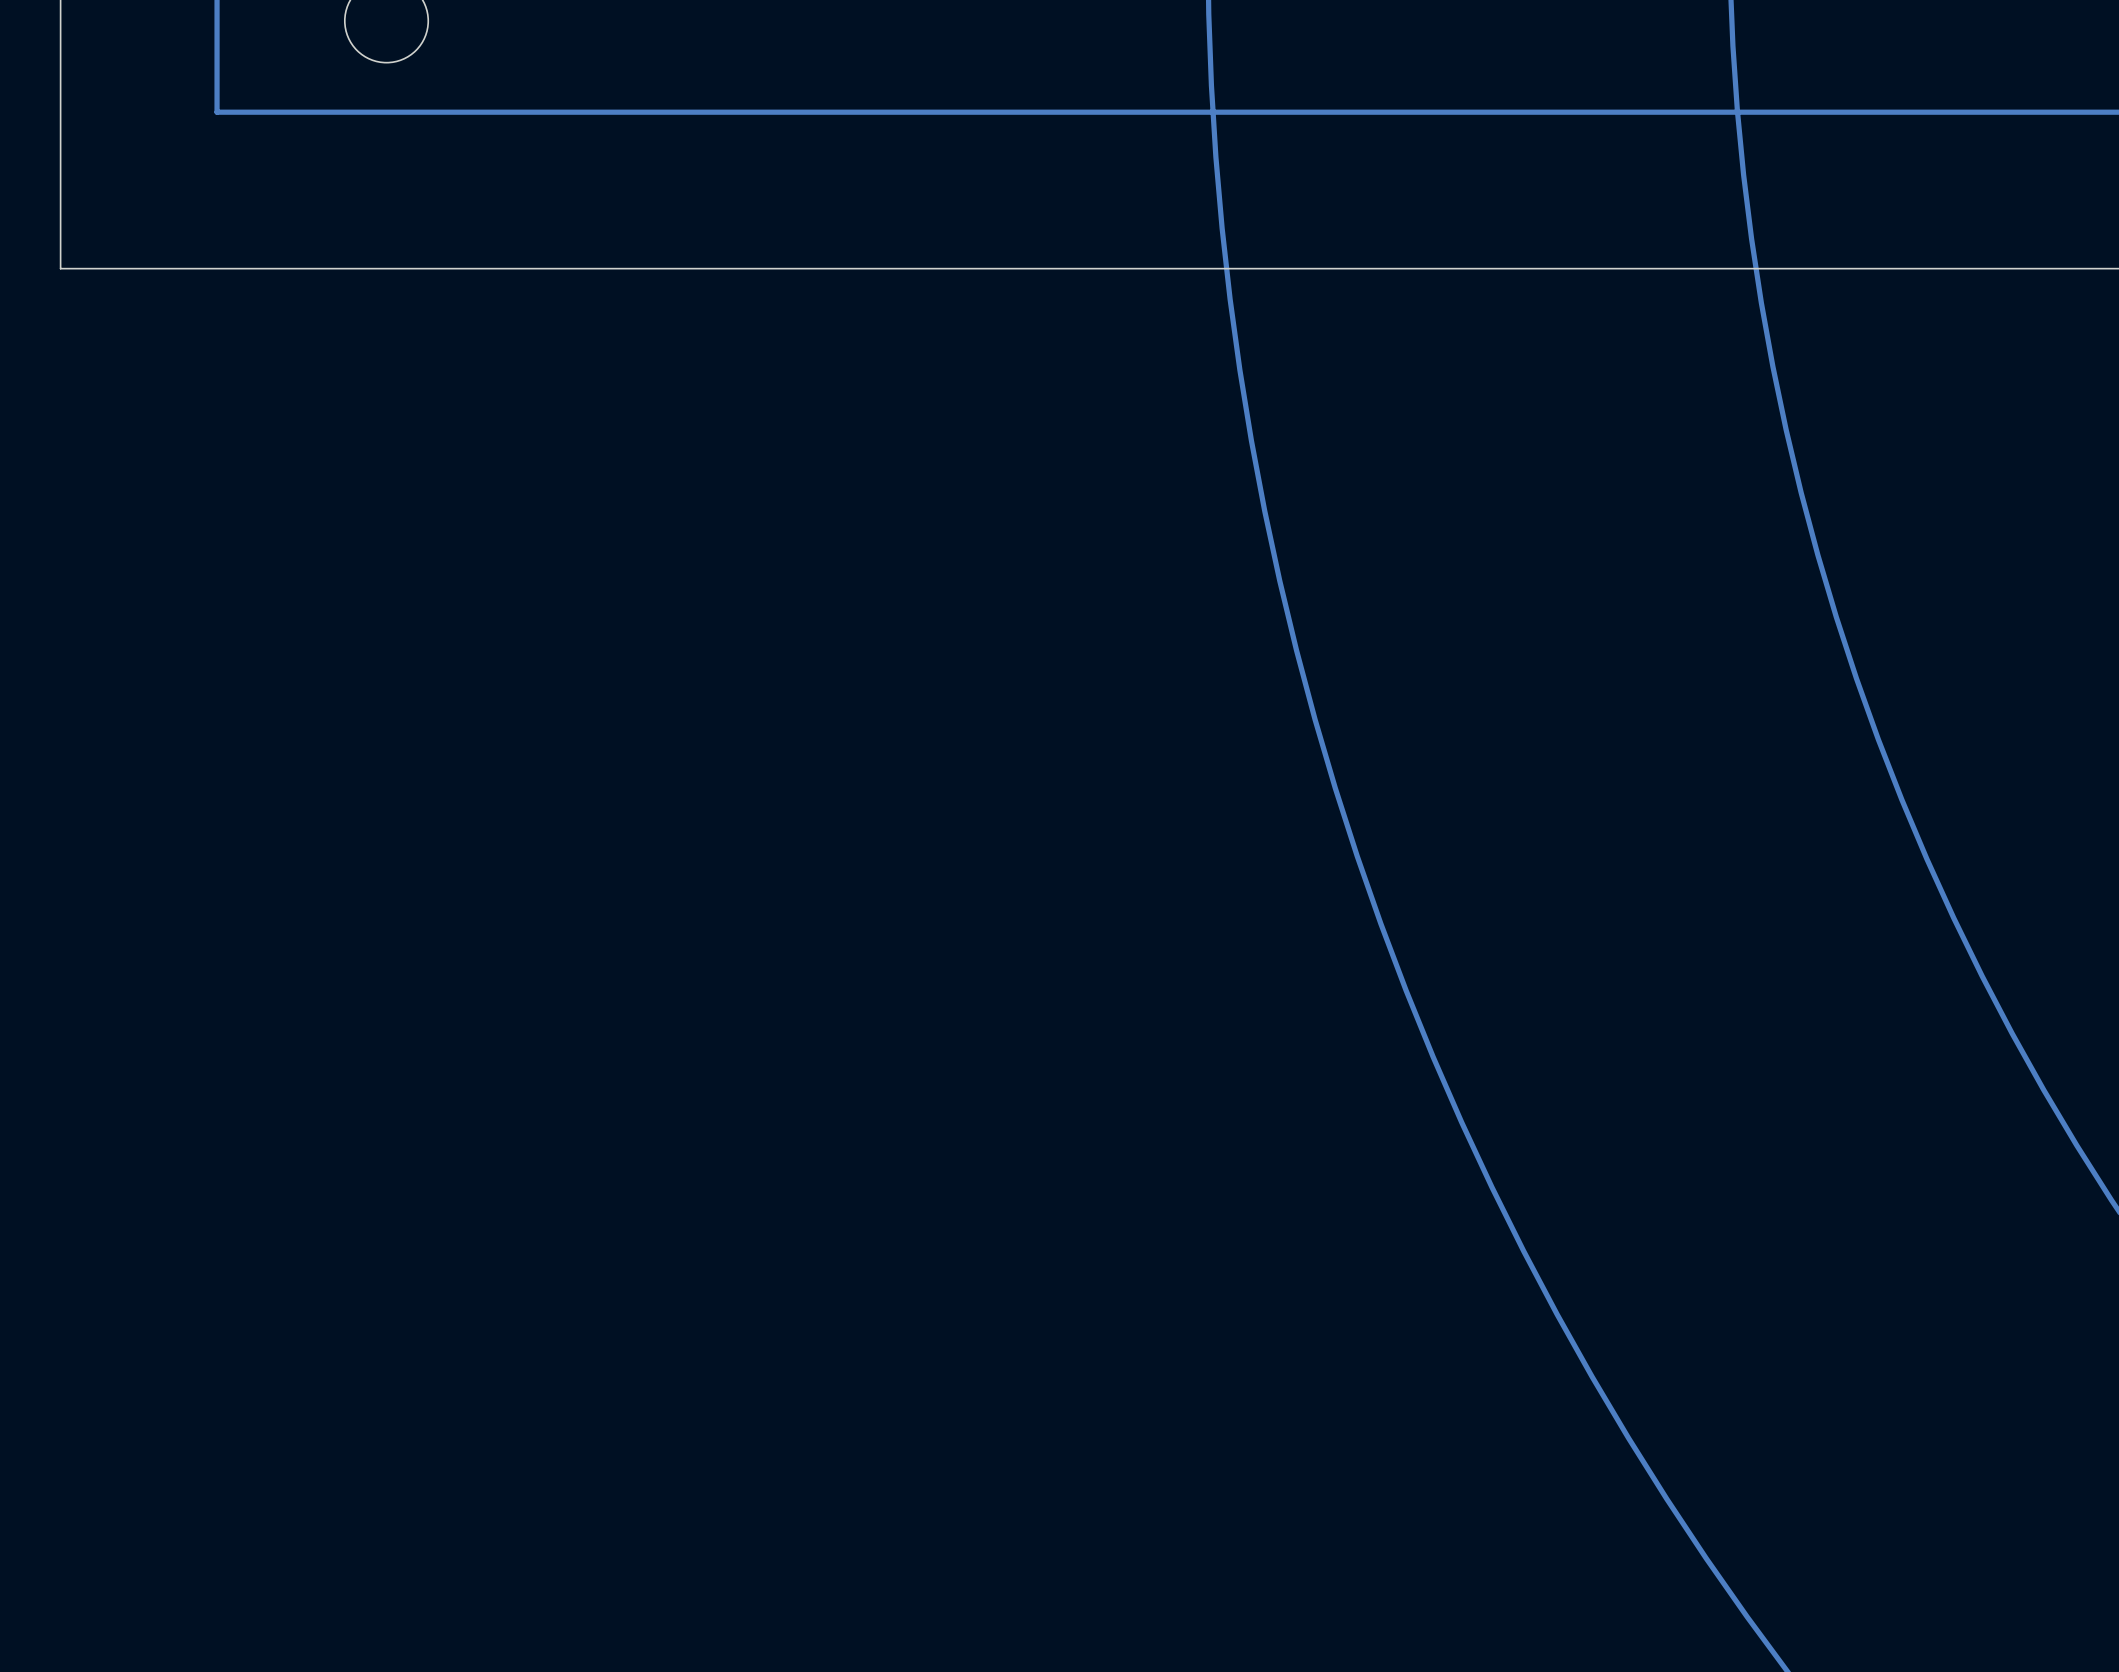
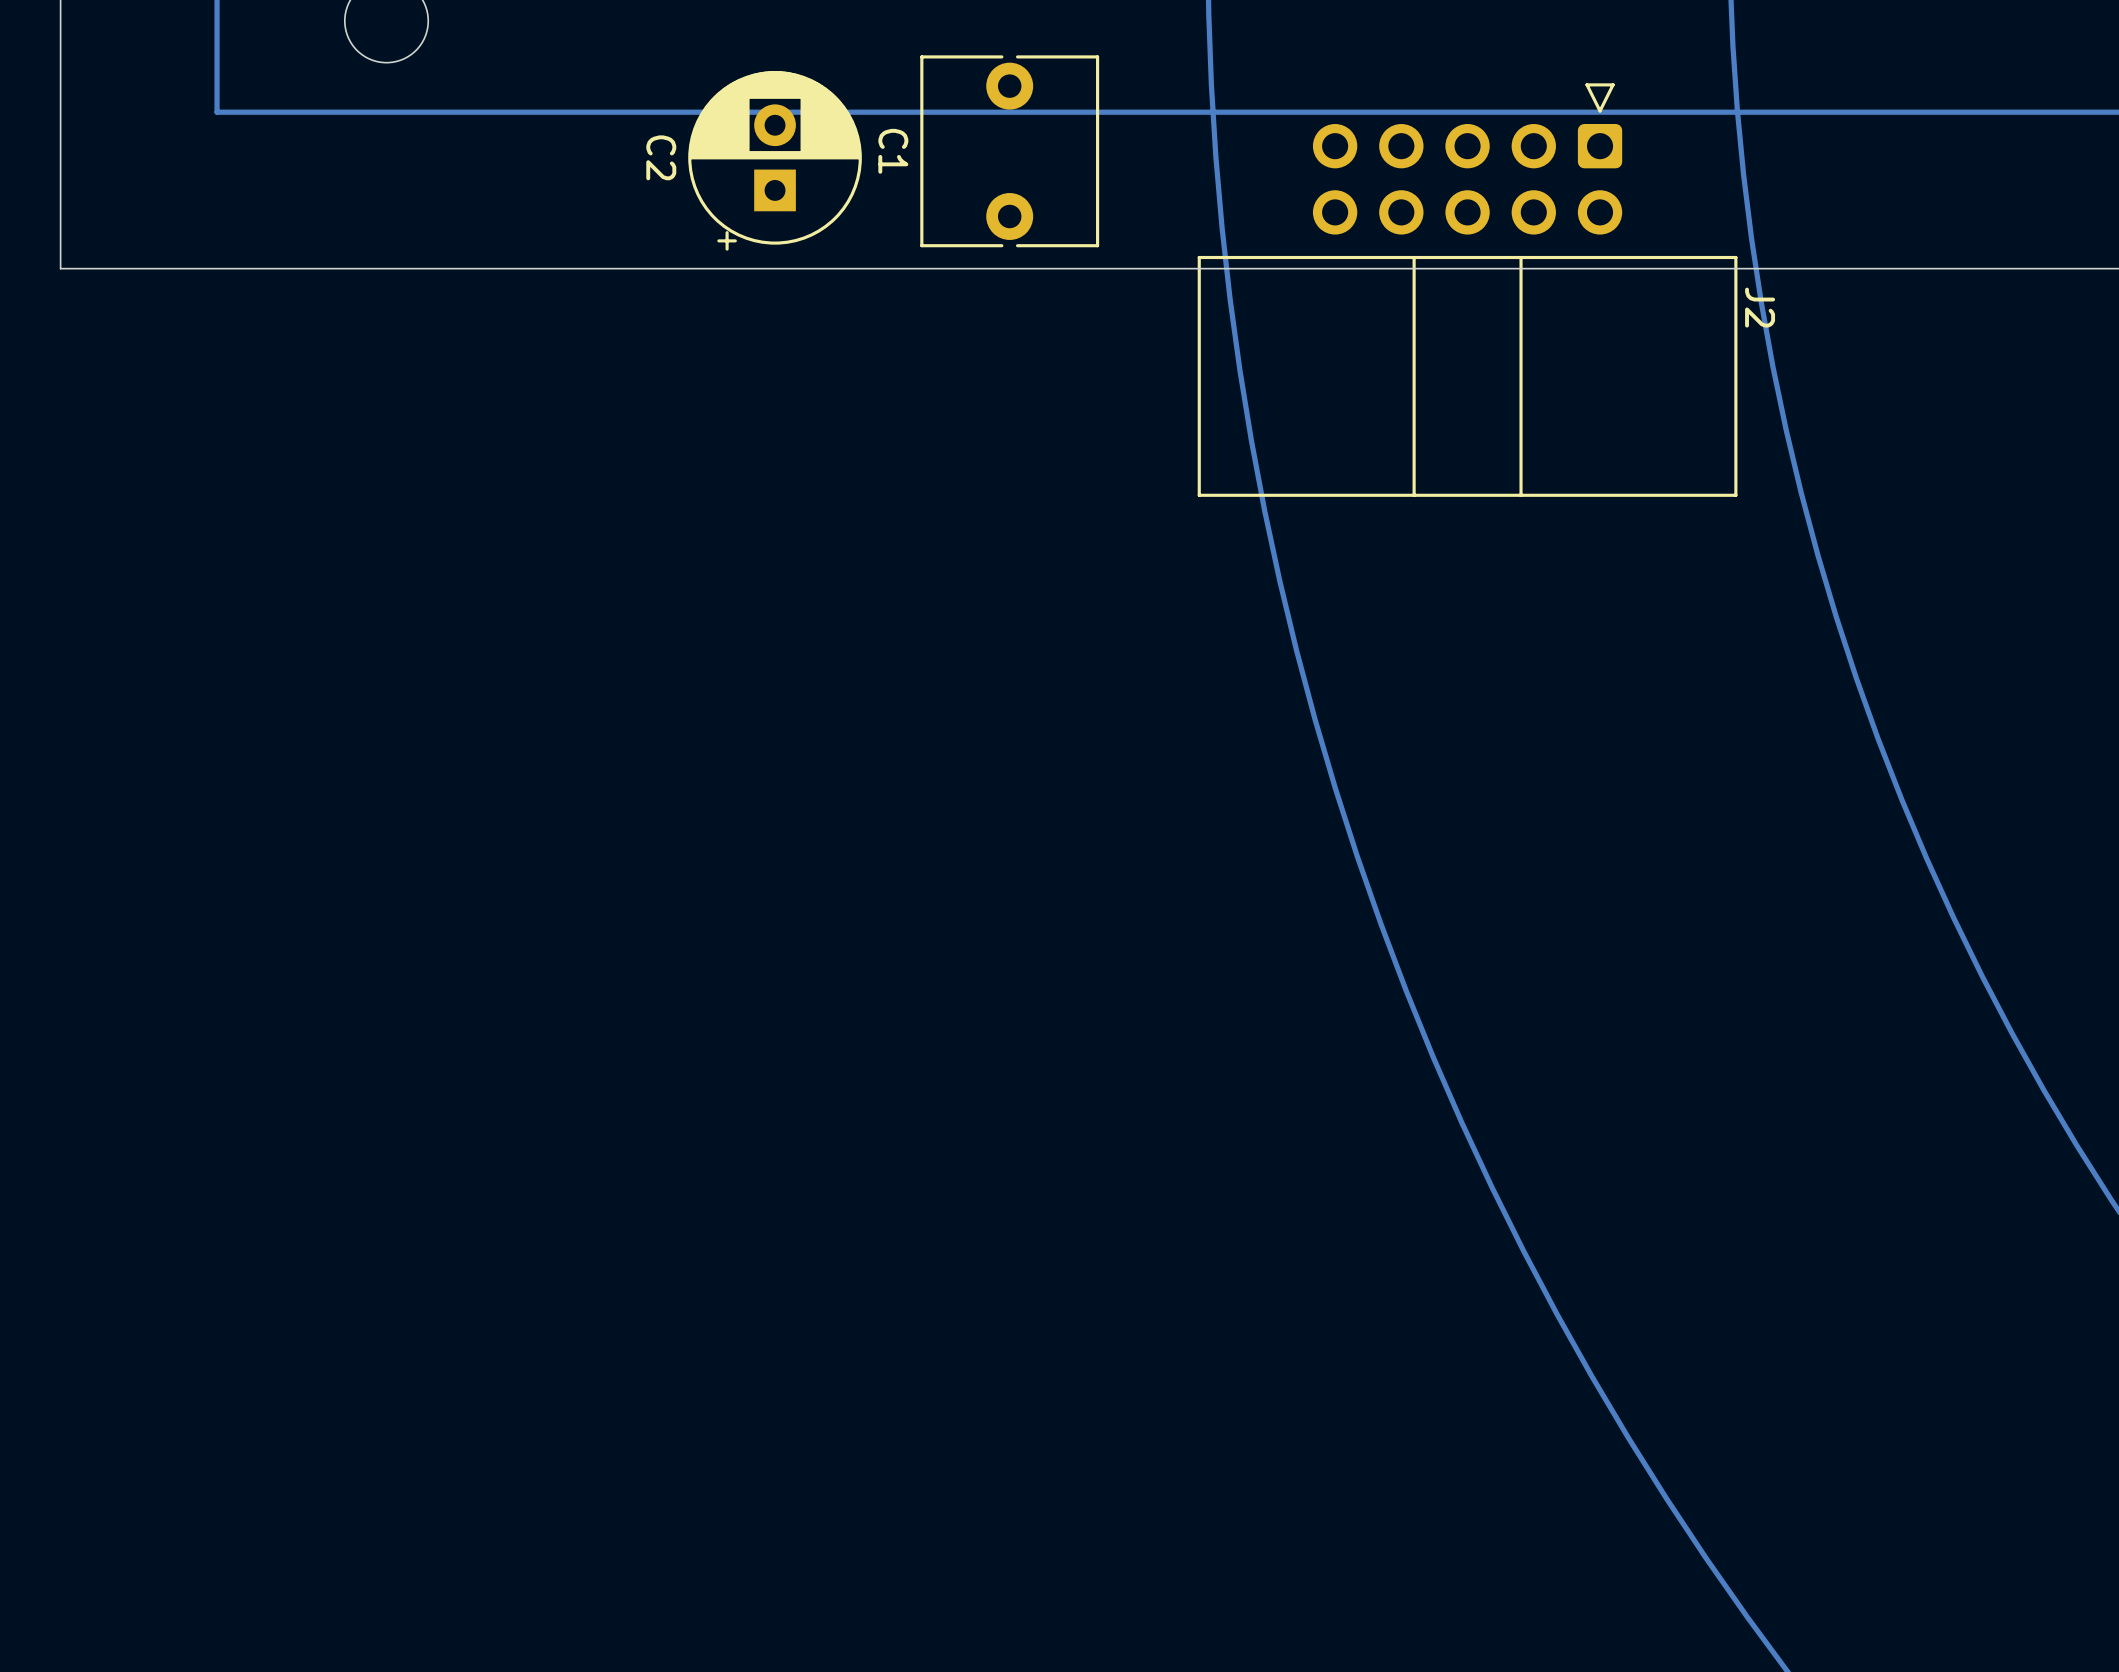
C1: none -> (1009, 151)
C2: none -> (775, 160)
J2: none -> (1467, 290)

